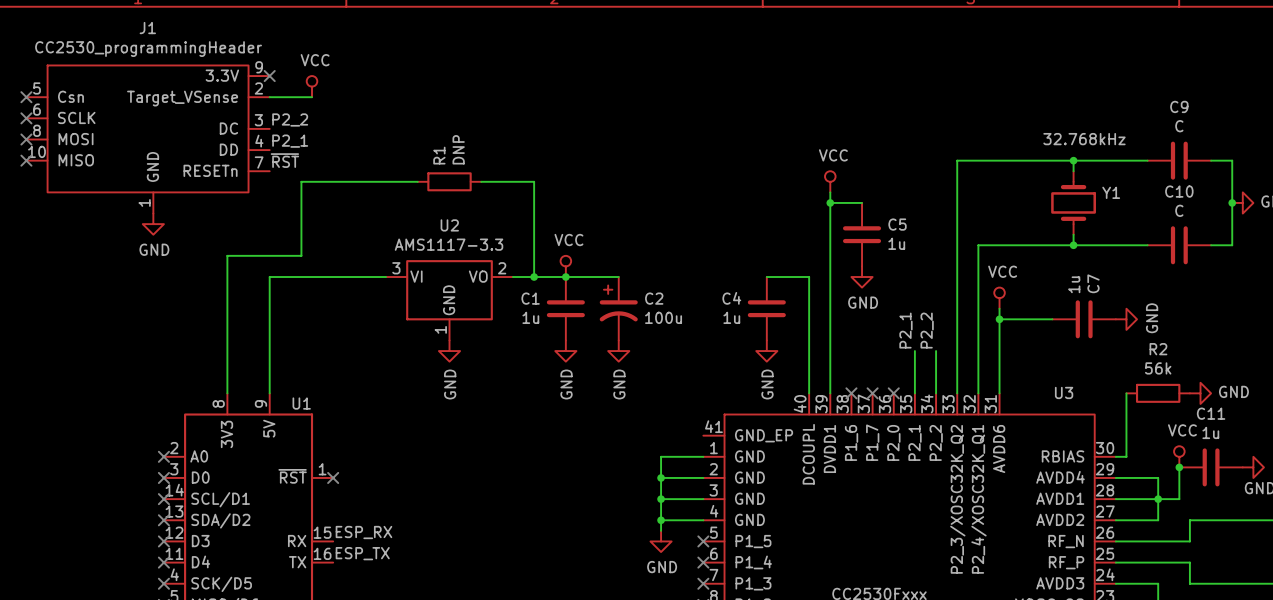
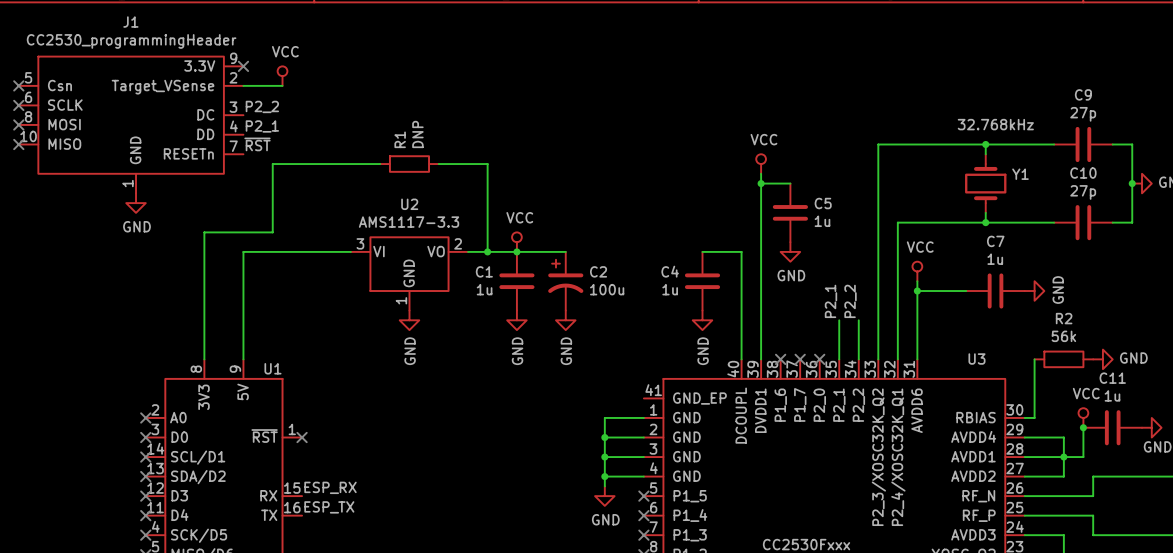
C9 value: C (1179, 126) -> 27p (1083, 114)
C10 value: C (1179, 210) -> 27p (1083, 192)
C7 name rotation: 0° (1093, 283) -> 90° clockwise (995, 241)
C7 value rotation: 0° (1074, 284) -> 90° clockwise (995, 259)

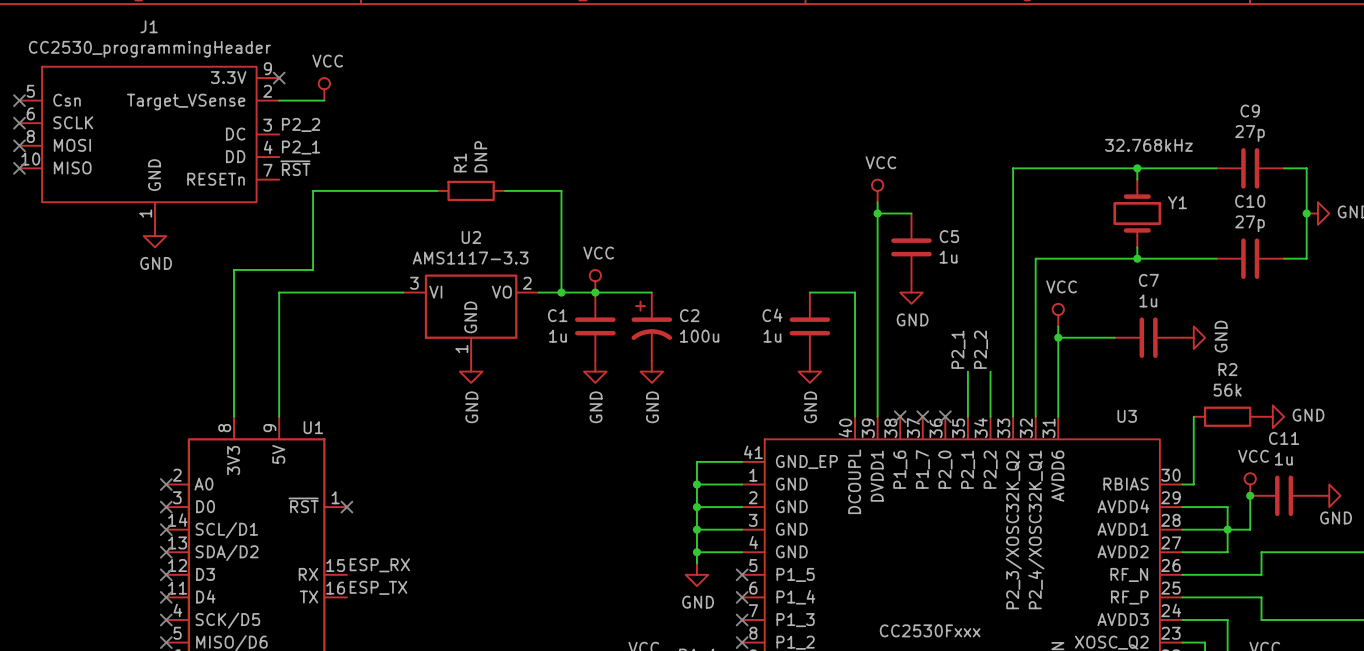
wire: none -> (742, 461) (696, 461) (696, 484)
junction: none -> (696, 484)

